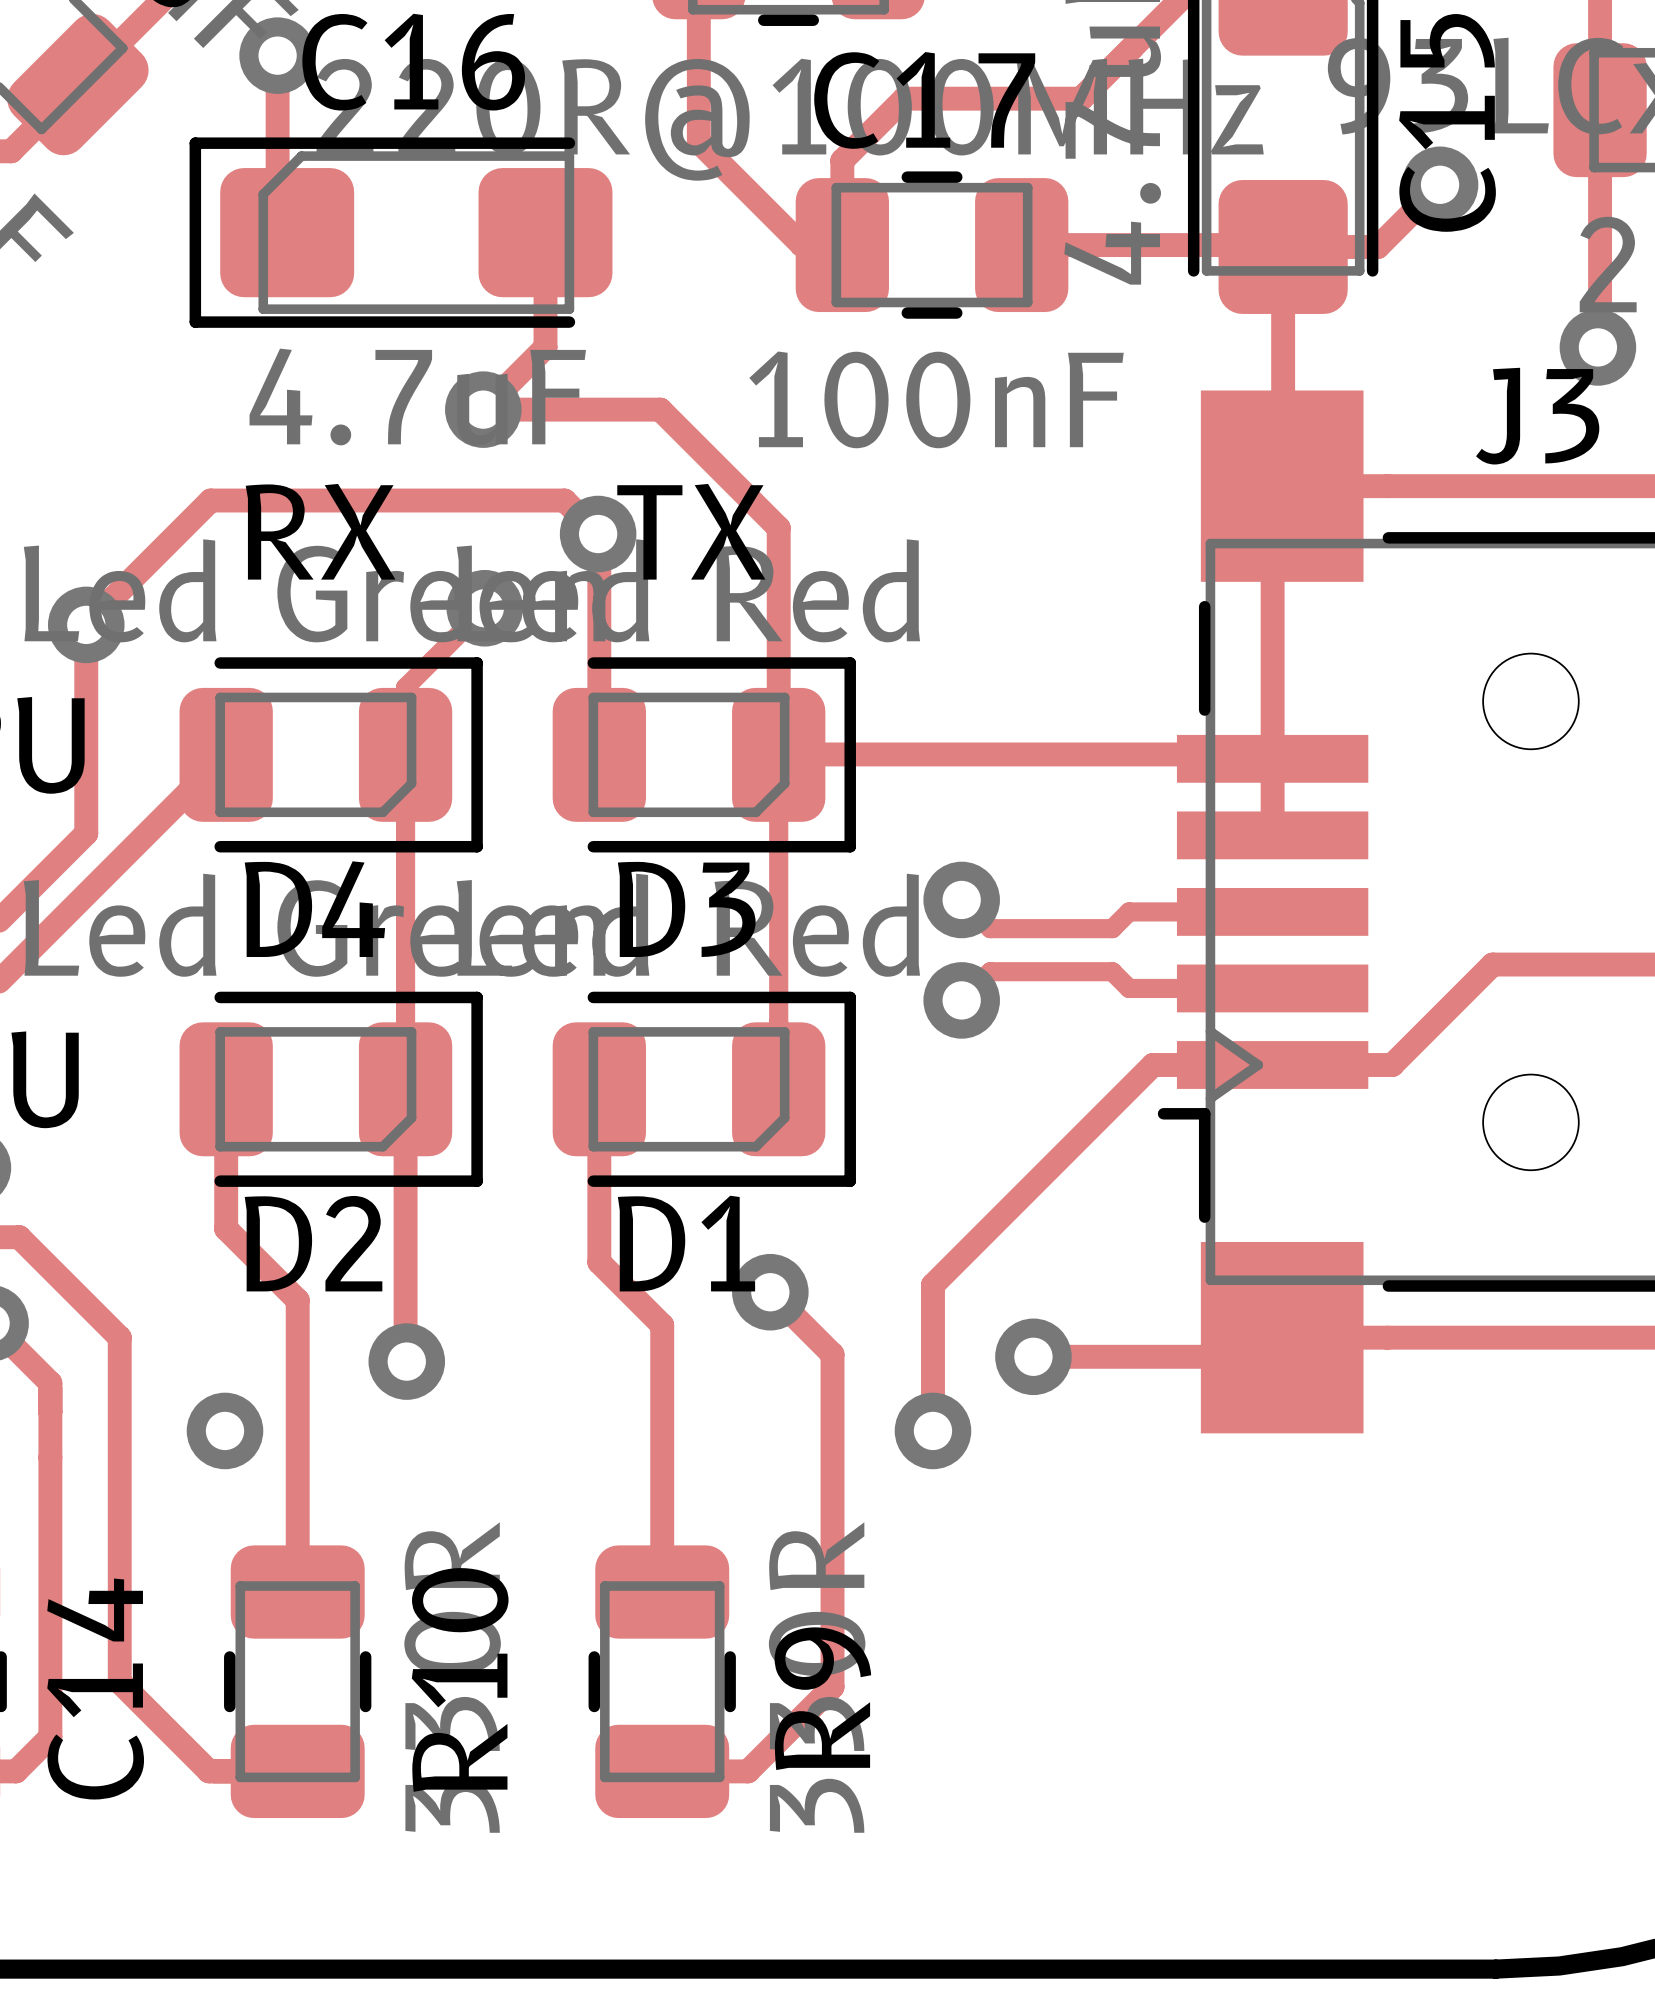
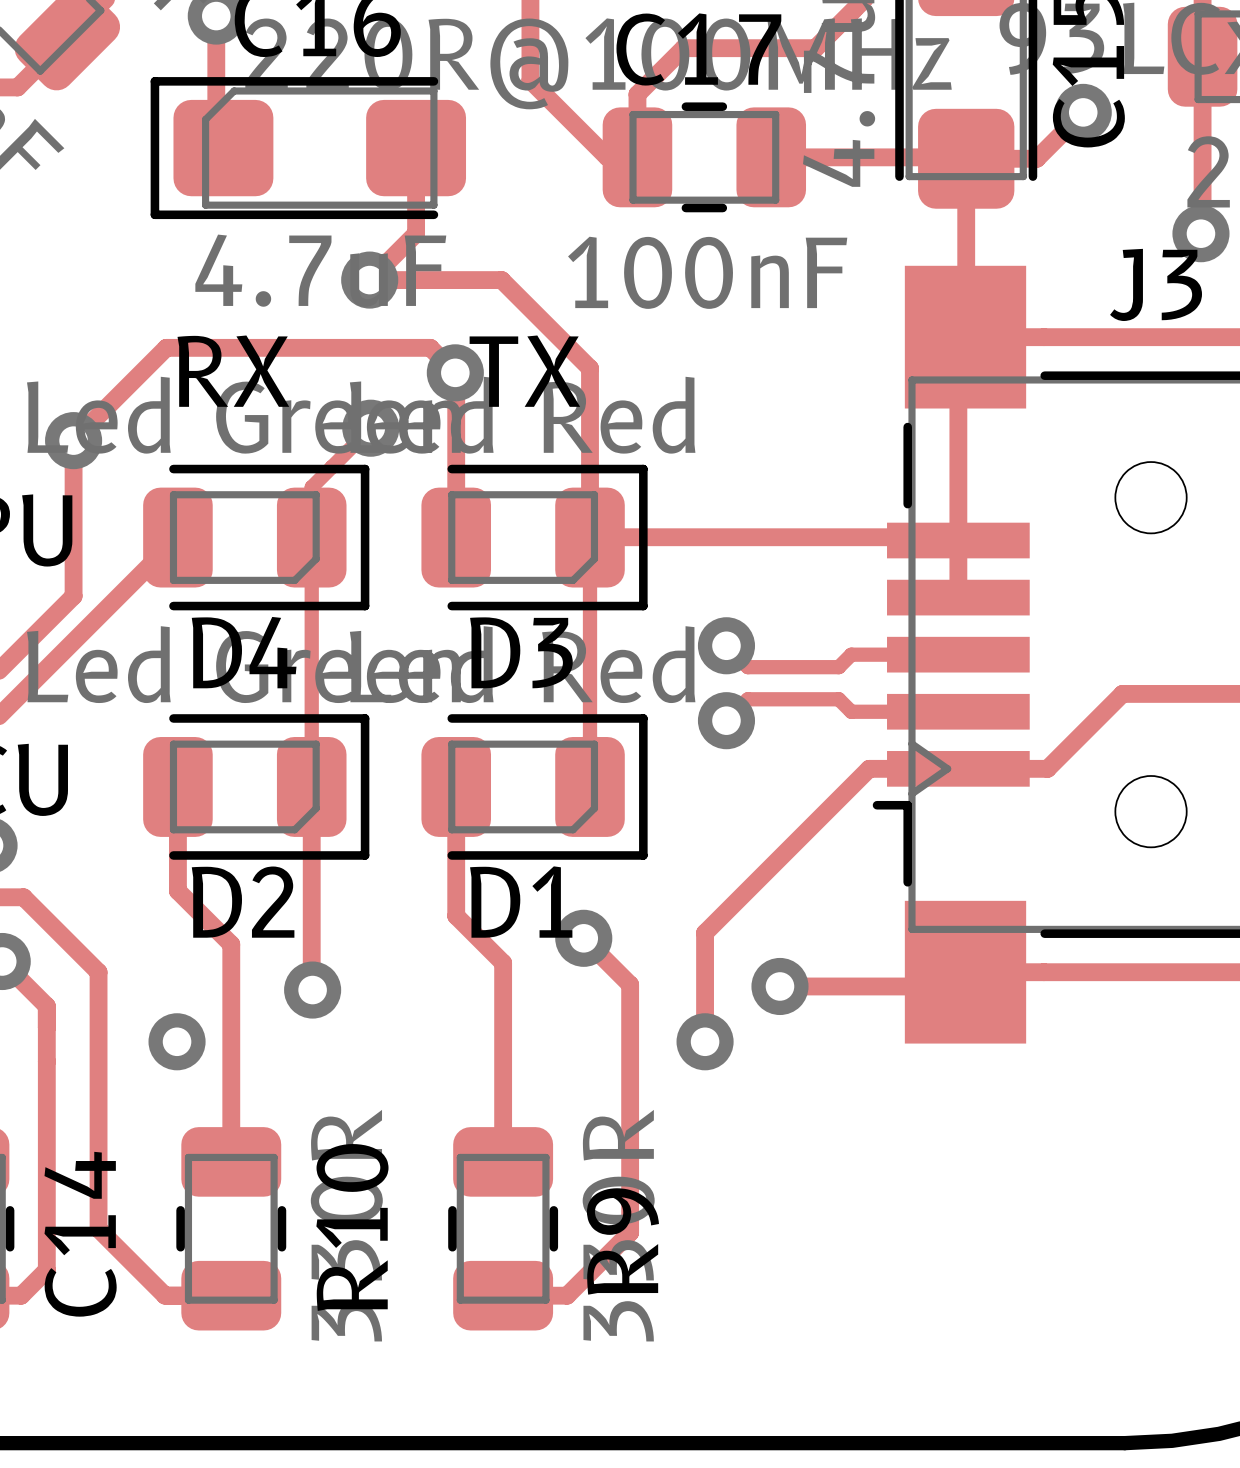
text position: RX (320, 531) -> RX (233, 371)

